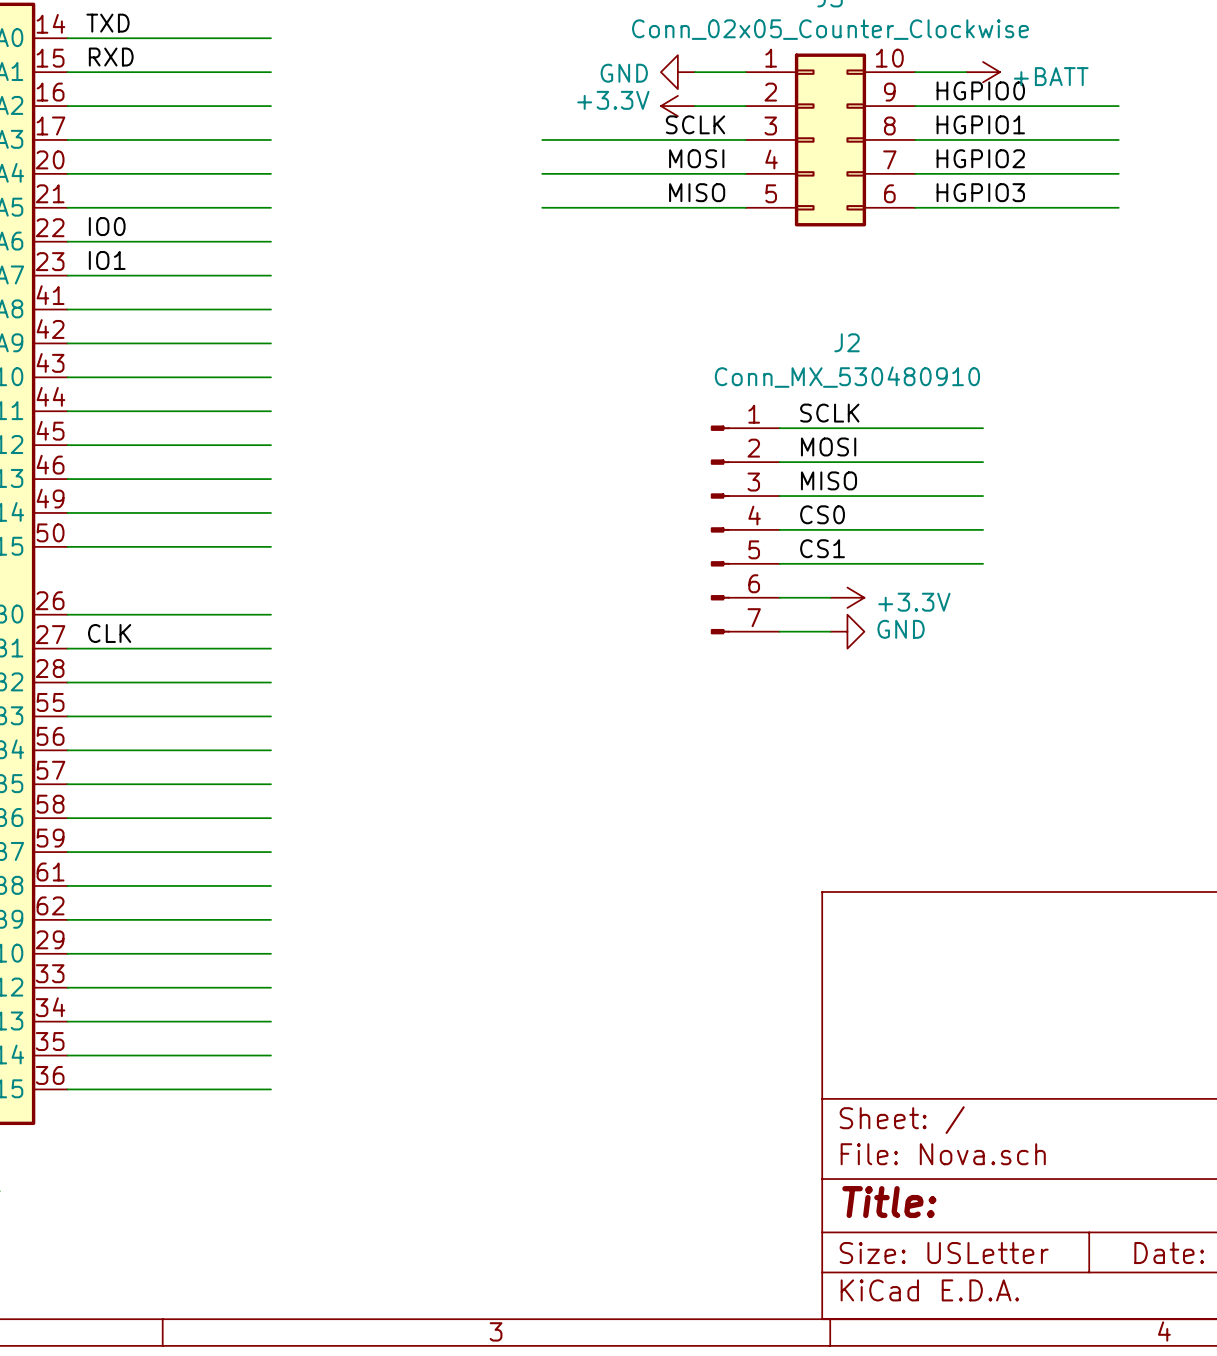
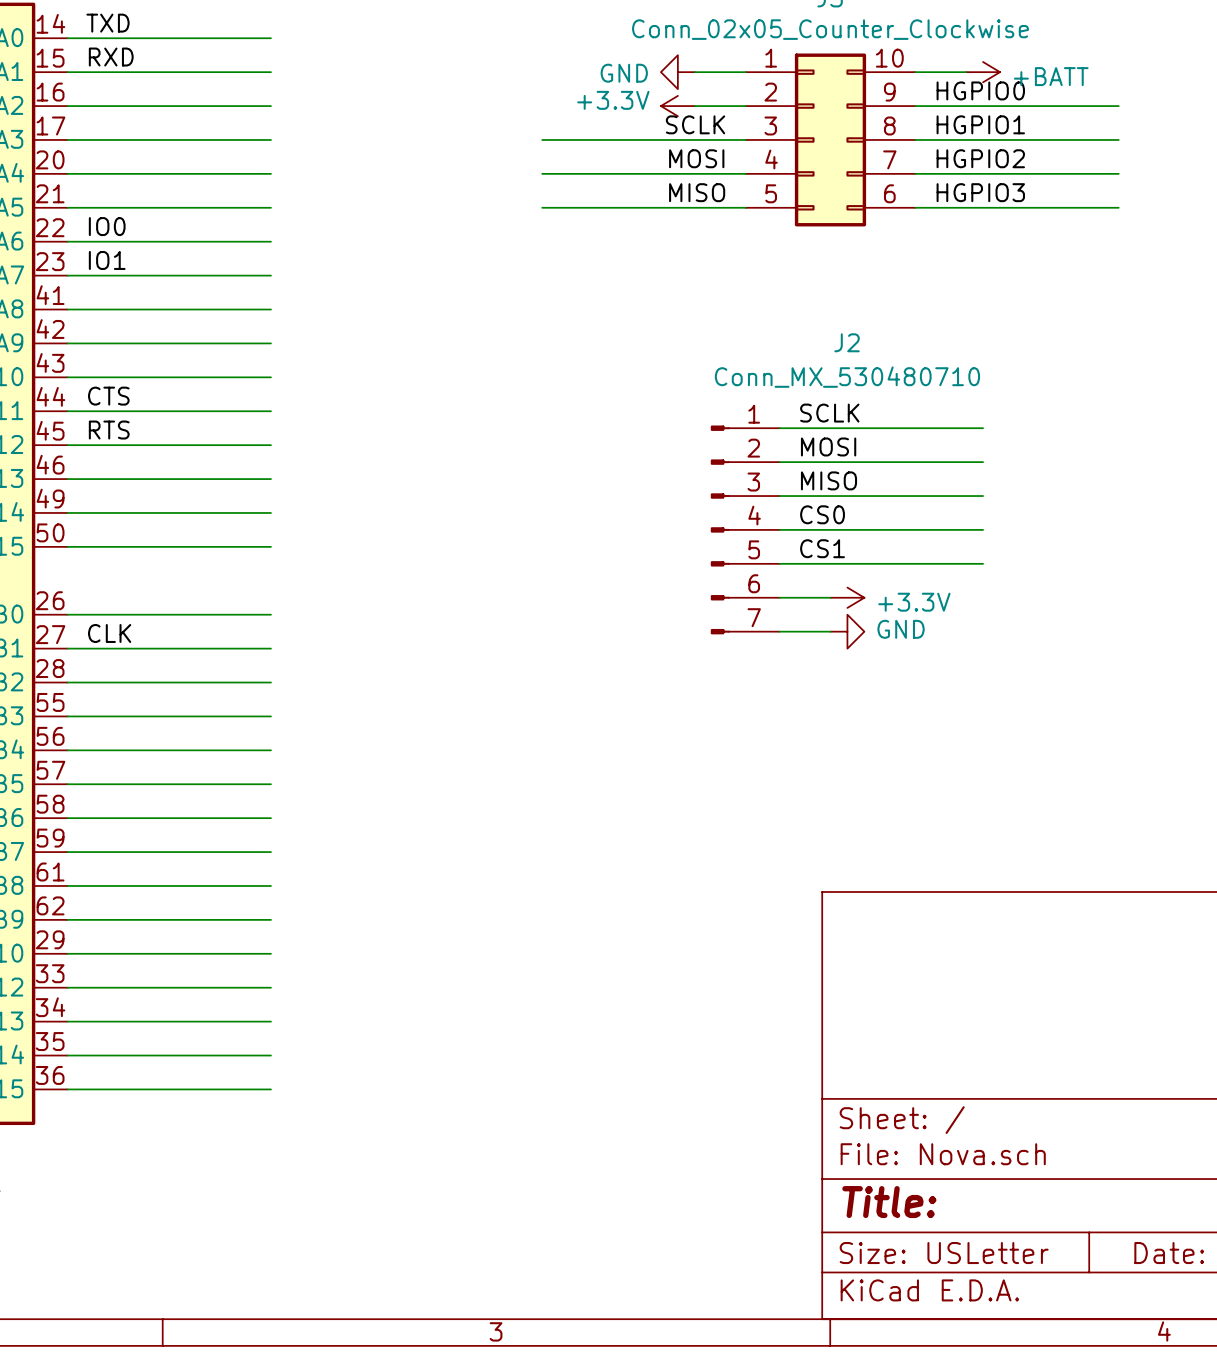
J2 value: Conn_MX_530480910 (847, 377) -> Conn_MX_530480710 (847, 377)
label: none -> CTS (108, 396)
label: none -> RTS (109, 430)

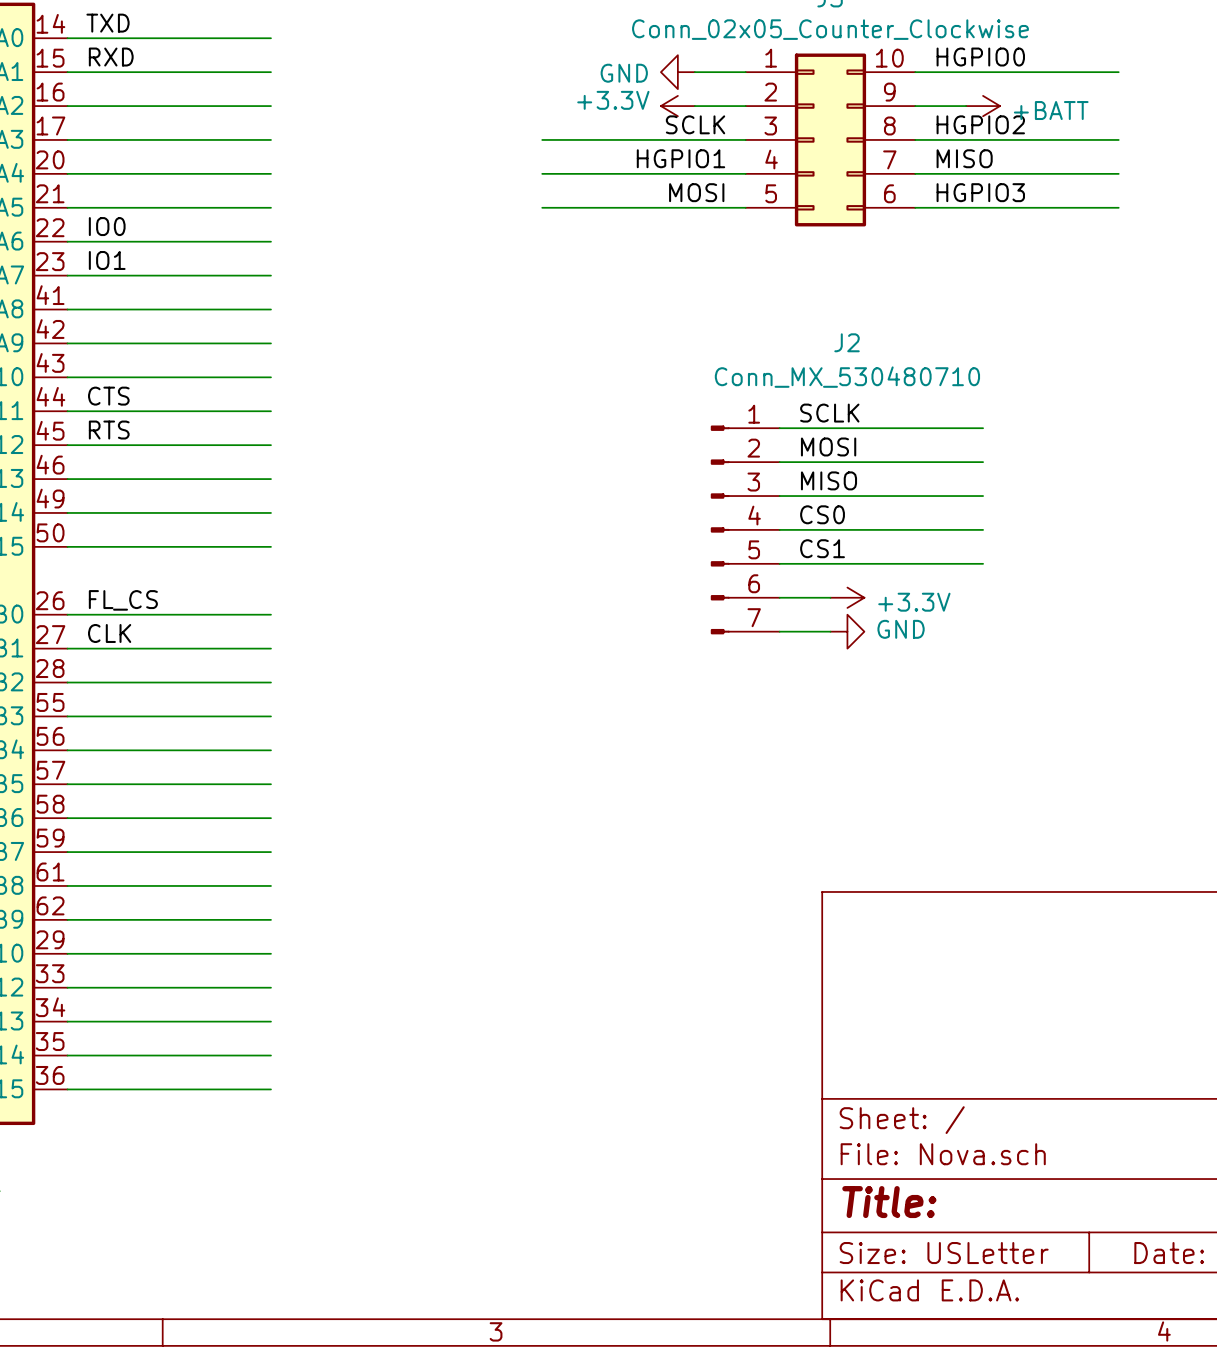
power symbol position: +BATT (983, 72) -> +BATT (983, 106)
label position: HGPIO0 (980, 90) -> HGPIO0 (980, 57)
wire: (966, 106) (1118, 106) -> (966, 72) (1118, 72)
label: HGPIO1 (980, 124) -> HGPIO2 (980, 124)
label: MOSI (696, 158) -> HGPIO1 (680, 158)
label: HGPIO2 (980, 158) -> MISO (964, 158)
label: MISO (697, 192) -> MOSI (696, 192)
label: none -> FL_CS (123, 600)

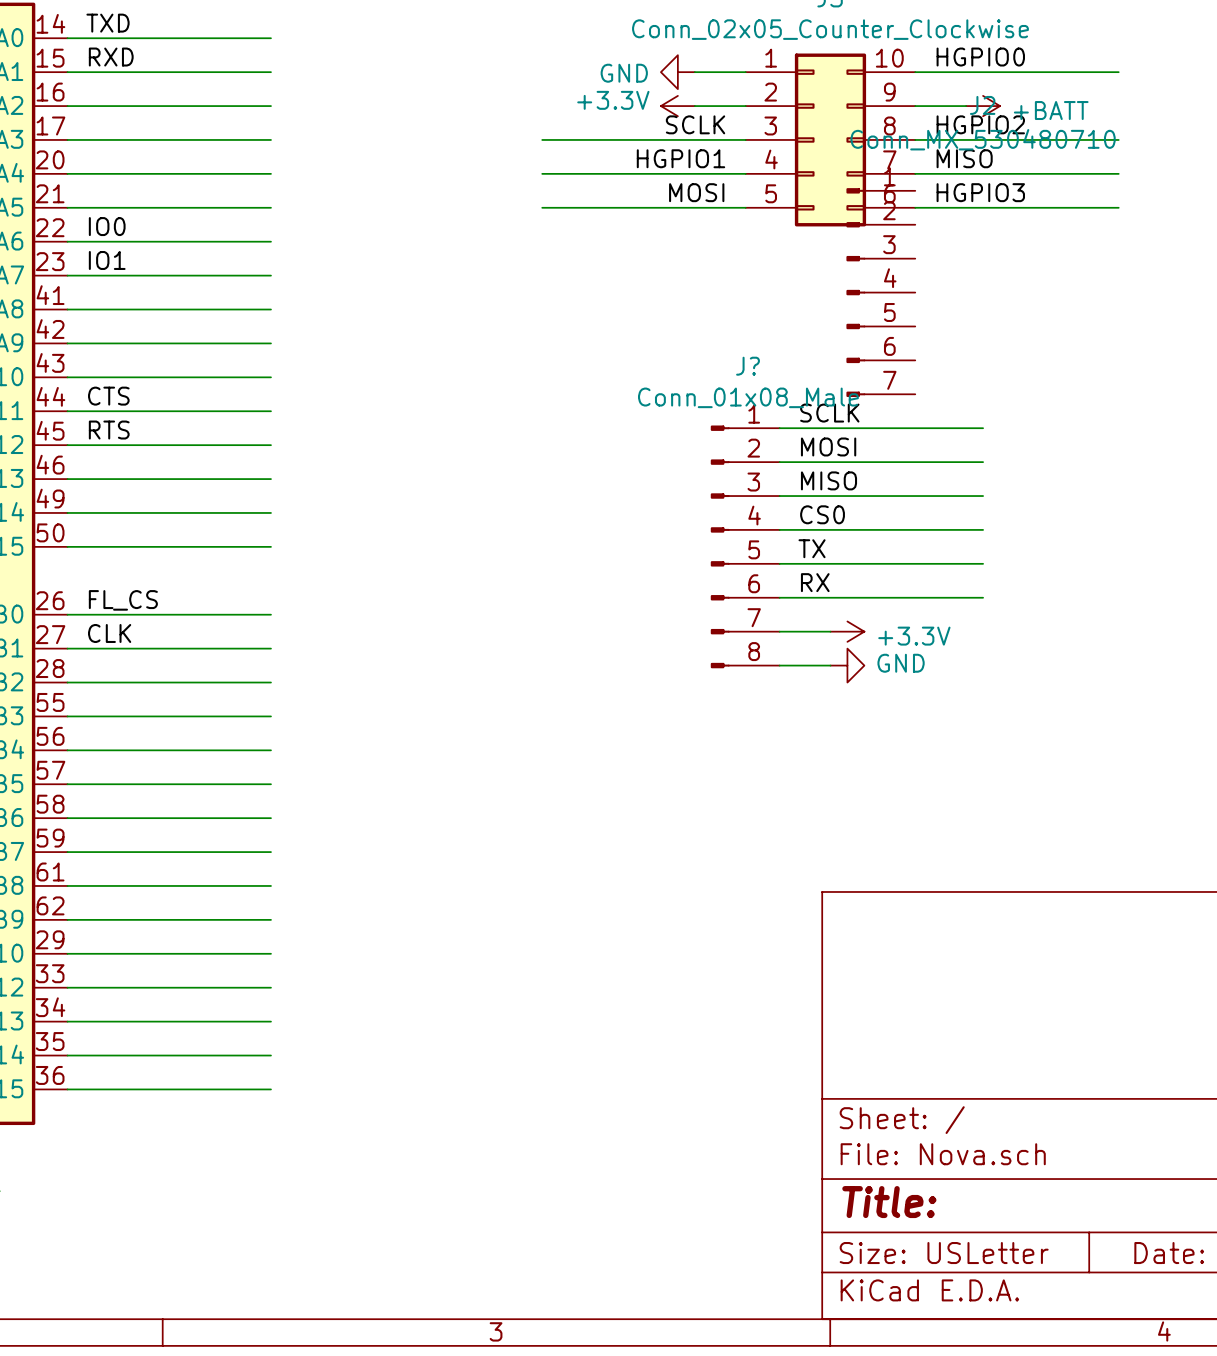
J2 position: (745, 529) -> (880, 292)
J?: none -> Conn_01x08_Male (745, 546)
label: CS1 (822, 548) -> TX (812, 548)
label: none -> RX (815, 582)
wire: none -> (830, 597) (983, 597)
power symbol: +3.3V (847, 597) -> none
power symbol: GND (847, 631) -> +3.3V (847, 631)
wire: none -> (779, 665) (830, 665)
power symbol: none -> GND (847, 665)

